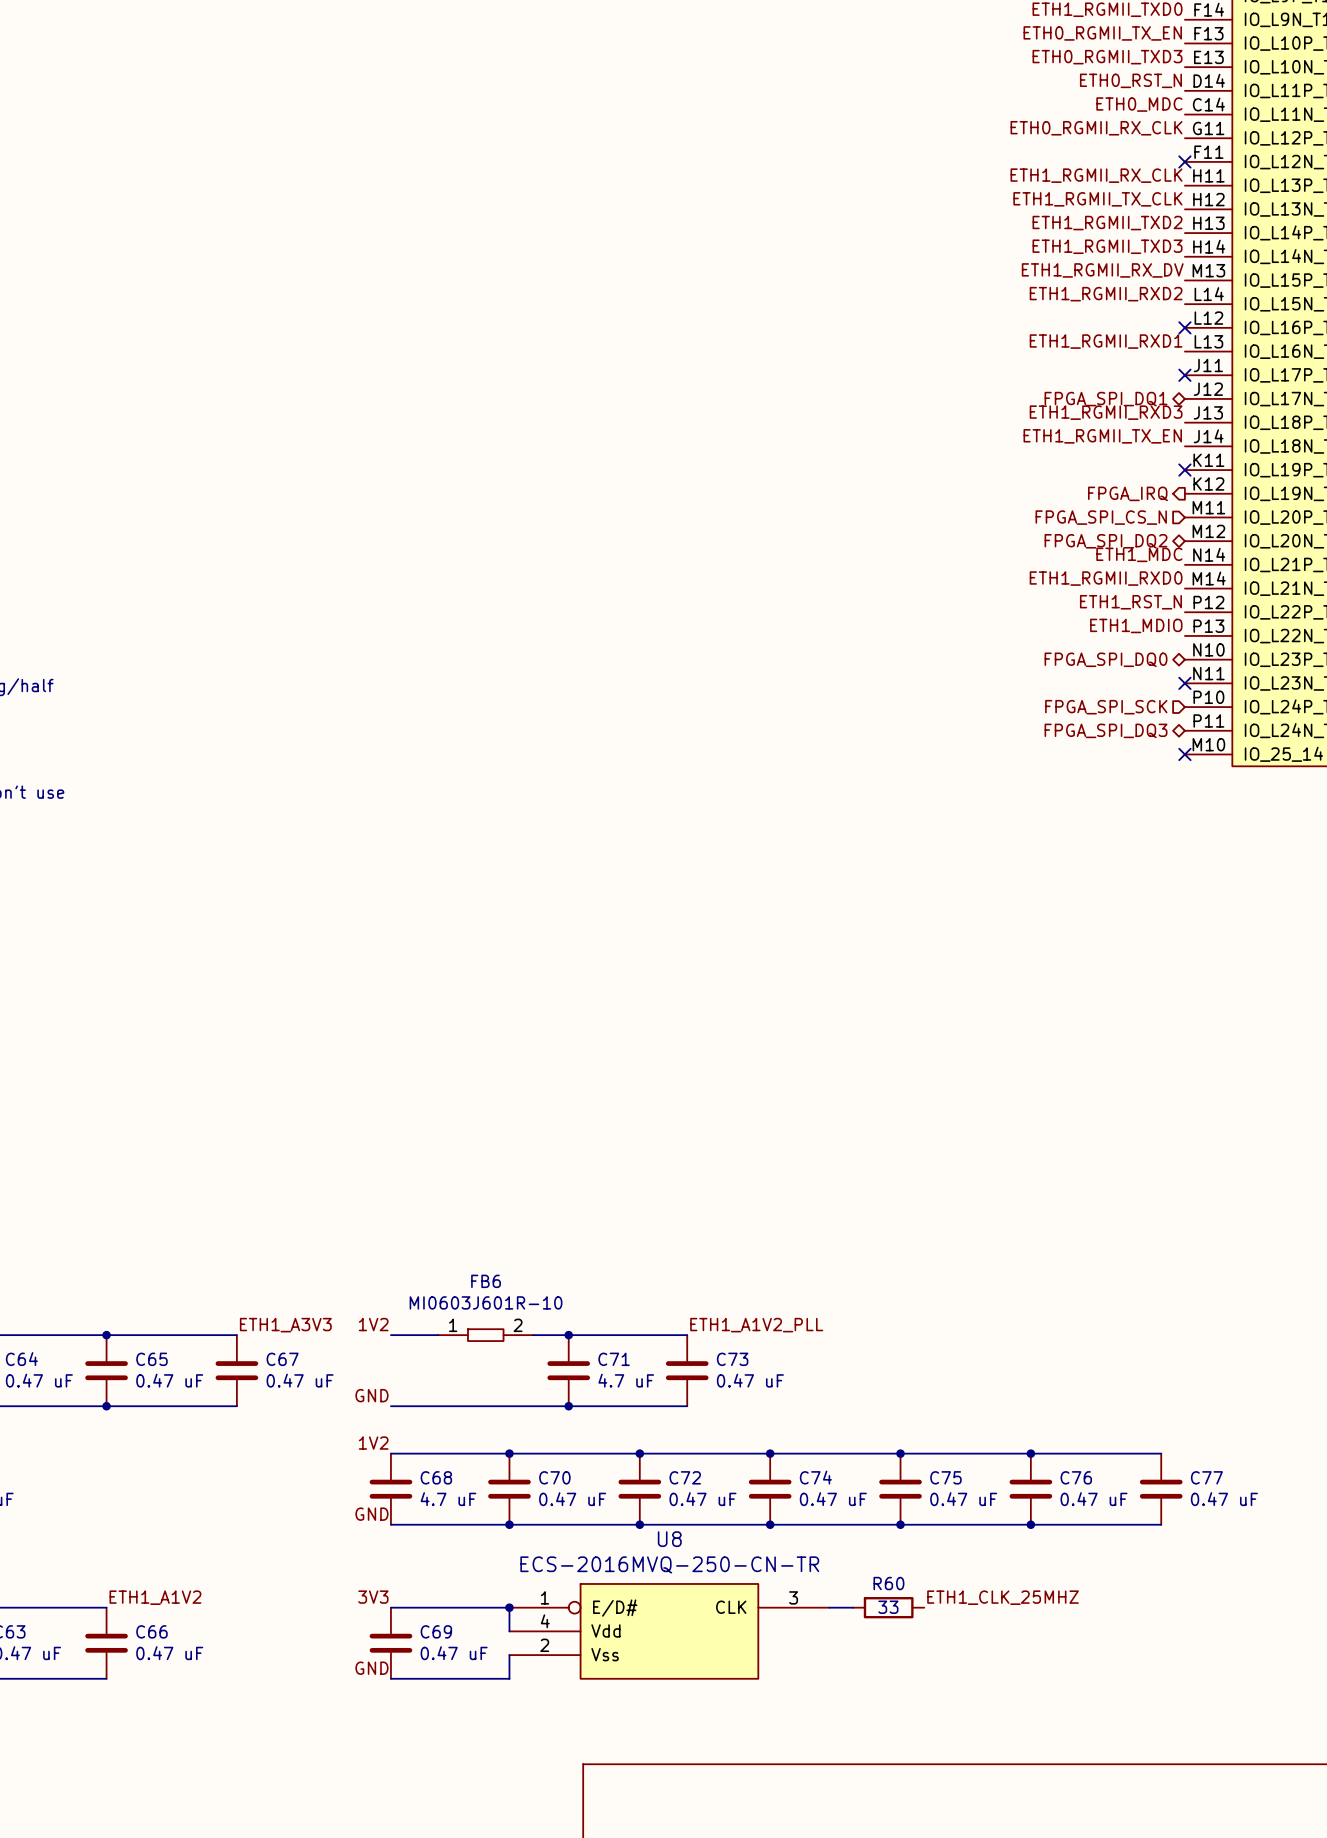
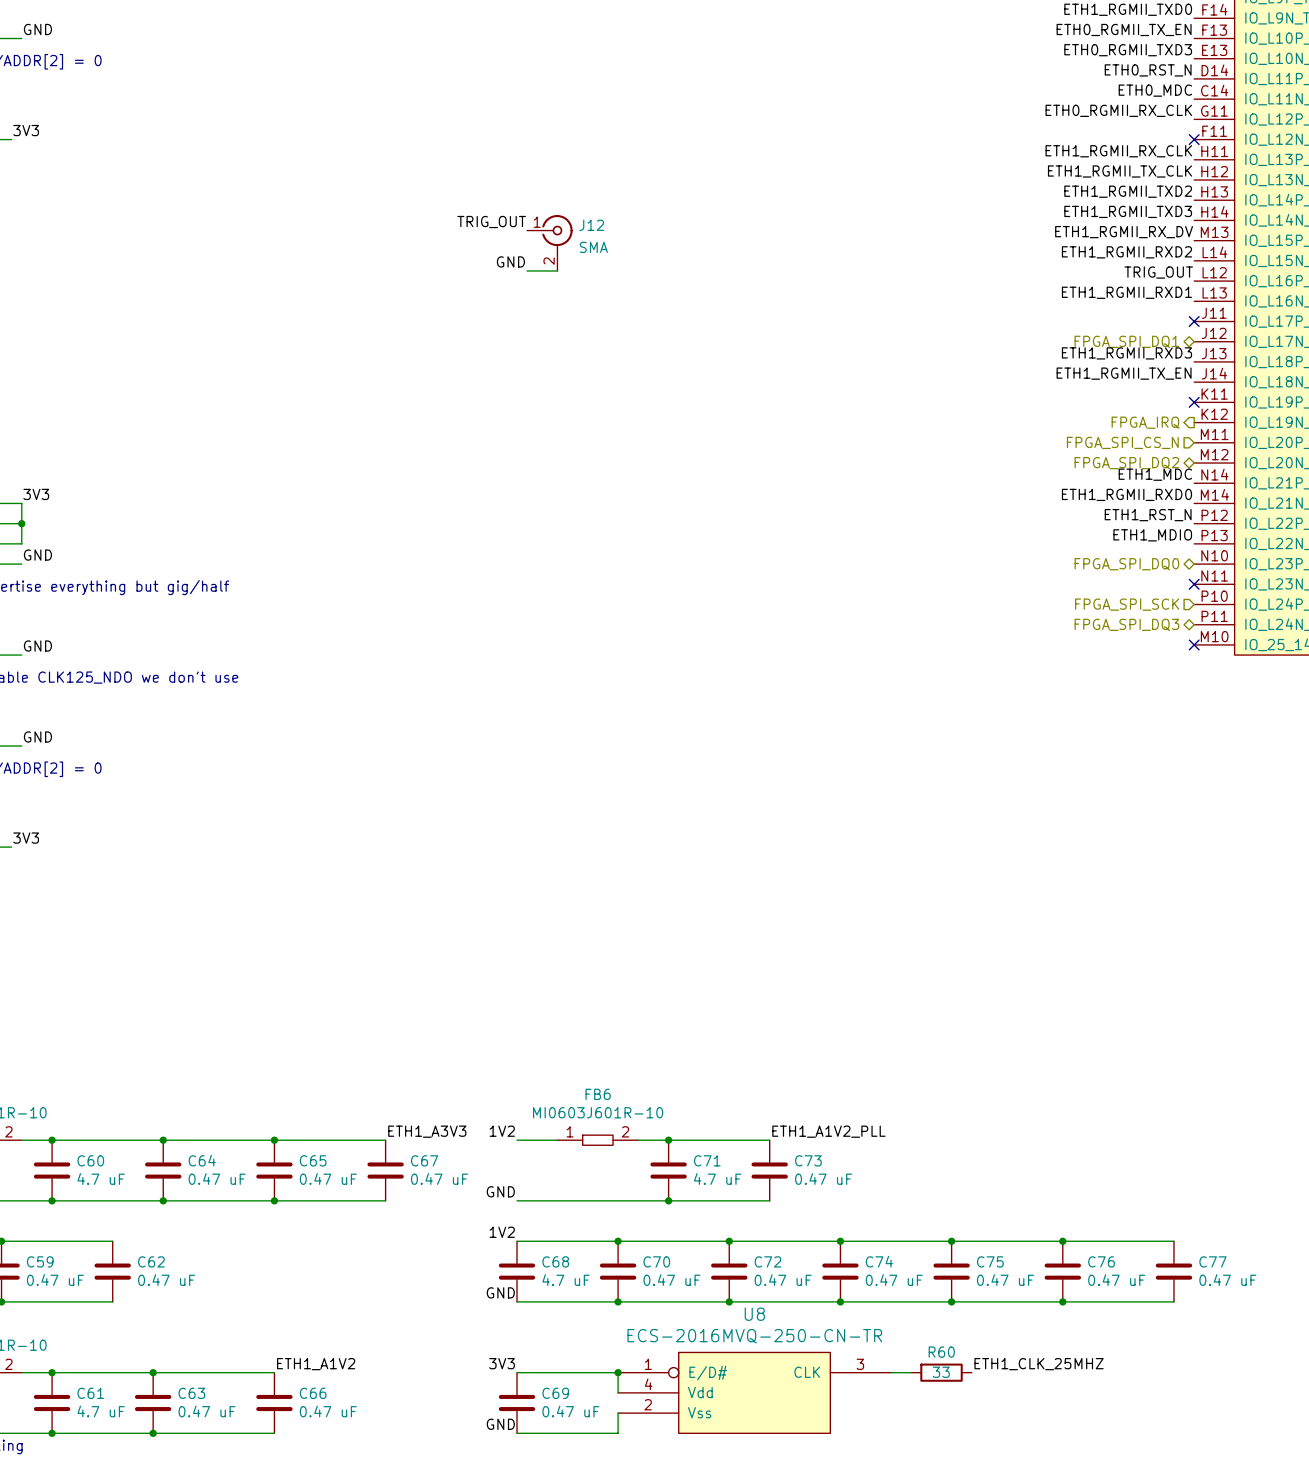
label: none -> TRIG_OUT (491, 222)
J12: none -> SMA (549, 242)
label: none -> GND (510, 261)
wire: none -> (527, 270) (557, 270)
label: none -> TRIG_OUT (1158, 272)
no-connect mark: (1184, 327) -> none

